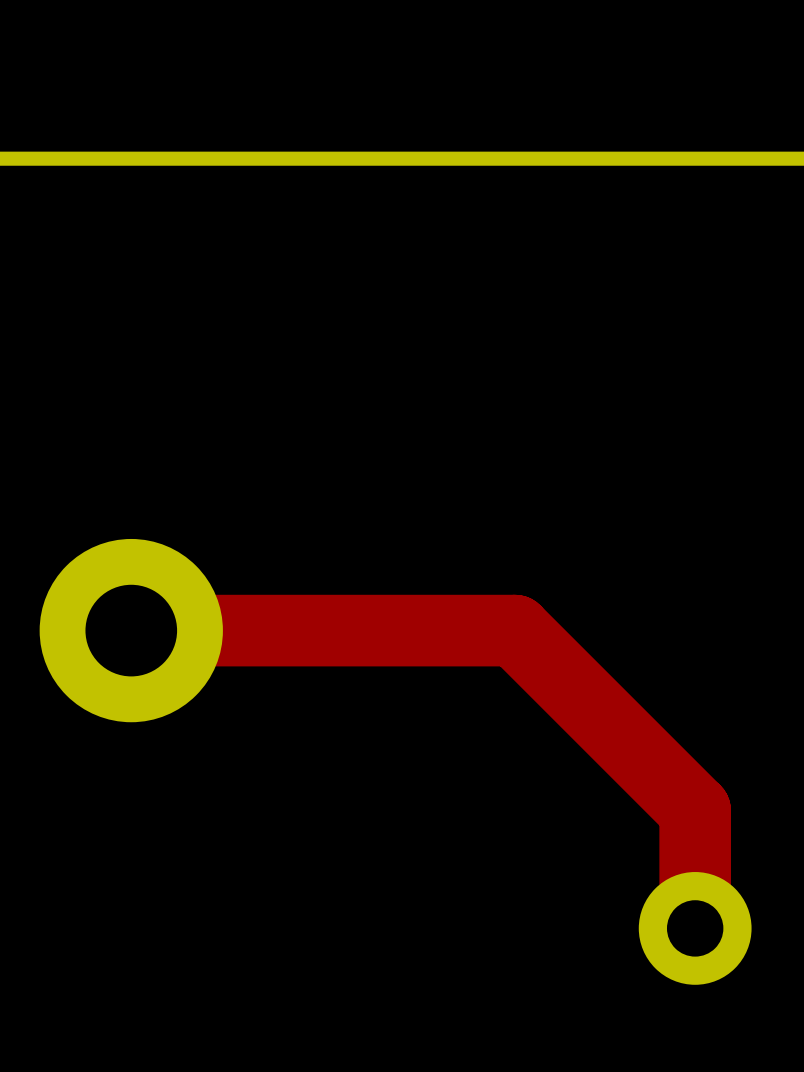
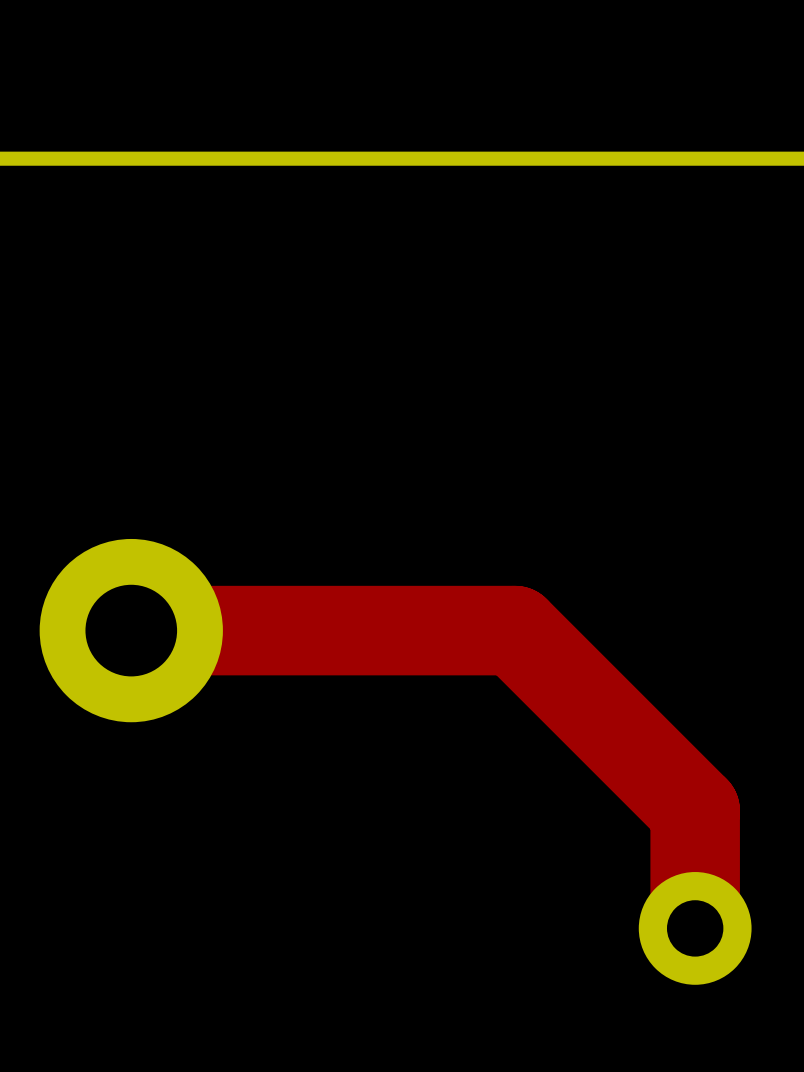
top track width: thin (131, 630) (515, 630) (695, 810) (695, 928) -> thick (131, 630) (515, 630) (695, 810) (695, 928)

